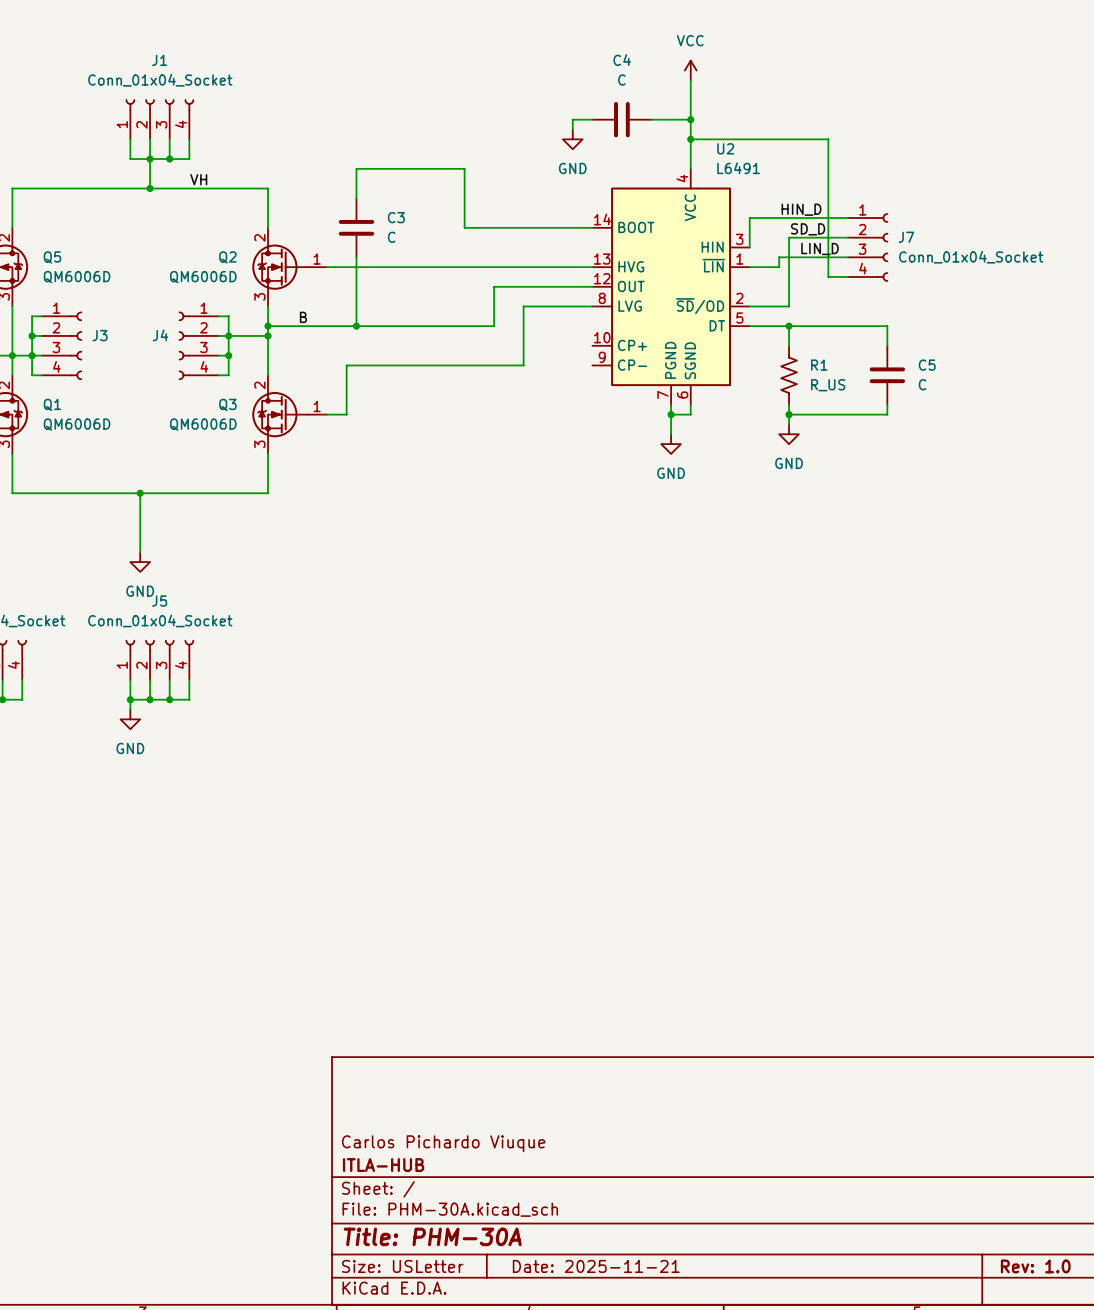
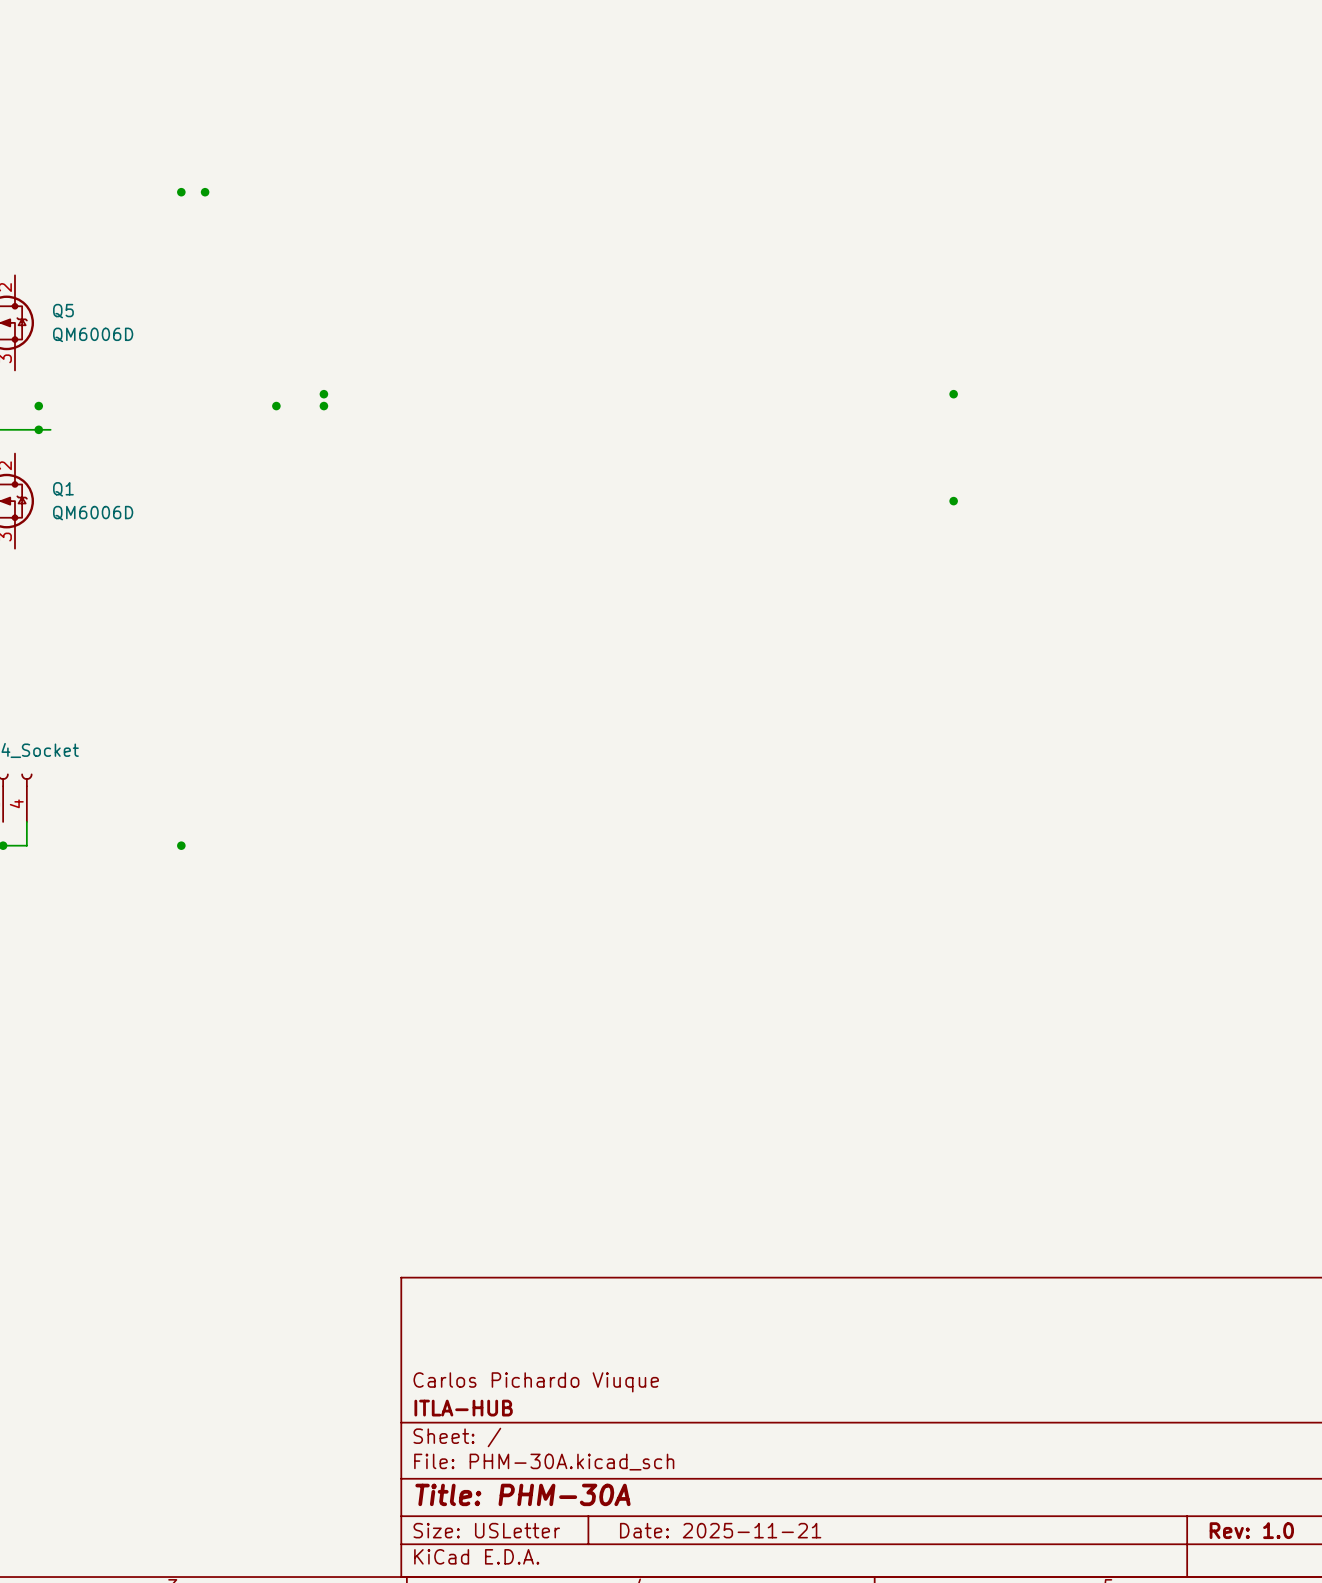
power symbol: VCC (690, 70) -> none
wire: (690, 80) (690, 168) -> none
J1: Conn_01x04_Socket (159, 119) -> none
wire: (592, 119) (572, 119) (572, 129) -> none
C4: C (621, 119) -> none
wire: (651, 119) (690, 119) -> none
junction: (690, 119) -> none
wire: (130, 139) (130, 159) (189, 159) (189, 139) -> none
wire: (150, 139) (150, 188) -> none
wire: (169, 139) (169, 159) -> none
power symbol: GND (572, 139) -> none
wire: (690, 139) (828, 139) (828, 276) (848, 276) -> none
junction: (690, 139) -> none
label: VH (198, 179) -> none
junction: (150, 188) -> none
wire: (356, 198) (356, 168) (464, 168) (464, 227) (592, 227) -> none
label: HIN_D (801, 209) -> none
wire: (848, 218) (749, 218) (749, 247) -> none
wire: (12, 227) (12, 188) (268, 188) (268, 227) -> none
C3: C (356, 227) -> none
label: SD_D (808, 229) -> none
wire: (848, 237) (789, 237) (789, 306) (749, 306) -> none
J7: Conn_01x04_Socket (867, 247) -> none
label: LIN_D (820, 249) -> none
wire: (356, 257) (356, 326) -> none
wire: (848, 257) (779, 257) (779, 267) (749, 267) -> none
Q2: QM6006D (289, 267) -> none
wire: (326, 267) (592, 267) -> none
wire: (592, 286) (494, 286) (494, 326) (268, 326) -> none
U2: L6491 (671, 286) -> none
wire: (12, 306) (12, 375) -> none
wire: (268, 306) (268, 375) -> none
wire: (592, 306) (523, 306) (523, 365) (346, 365) (346, 414) (326, 414) -> none
wire: (41, 316) (32, 316) (32, 375) (41, 375) -> none
wire: (218, 316) (228, 316) (228, 375) (218, 375) -> none
label: B (303, 317) -> none
junction: (356, 326) -> none
wire: (749, 326) (887, 326) (887, 345) -> none
wire: (789, 326) (789, 345) -> none
wire: (32, 335) (41, 335) -> none
wire: (218, 335) (268, 335) -> none
J3: (61, 345) -> none
J4: (198, 345) -> none
junction: (12, 355) -> none
wire: (218, 355) (228, 355) -> none
junction: (228, 355) -> none
R1: R_US (789, 375) -> none
C5: C (887, 375) -> none
wire: (671, 404) (671, 434) -> none
wire: (690, 404) (690, 414) (671, 414) -> none
wire: (789, 404) (789, 424) -> none
wire: (887, 404) (887, 414) (789, 414) -> none
Q3: QM6006D (289, 414) -> none
junction: (671, 414) -> none
power symbol: GND (789, 434) -> none
power symbol: GND (671, 444) -> none
wire: (12, 453) (12, 493) (268, 493) (268, 453) -> none
wire: (140, 493) (140, 552) -> none
junction: (140, 493) -> none
power symbol: GND (140, 562) -> none
J5: Conn_01x04_Socket (159, 660) -> none
wire: (2, 680) (2, 699) -> none
wire: (130, 680) (130, 709) -> none
wire: (150, 680) (150, 699) -> none
wire: (169, 680) (169, 699) -> none
wire: (189, 680) (189, 699) (130, 699) -> none
junction: (130, 699) -> none
junction: (169, 699) -> none
power symbol: GND (130, 719) -> none

